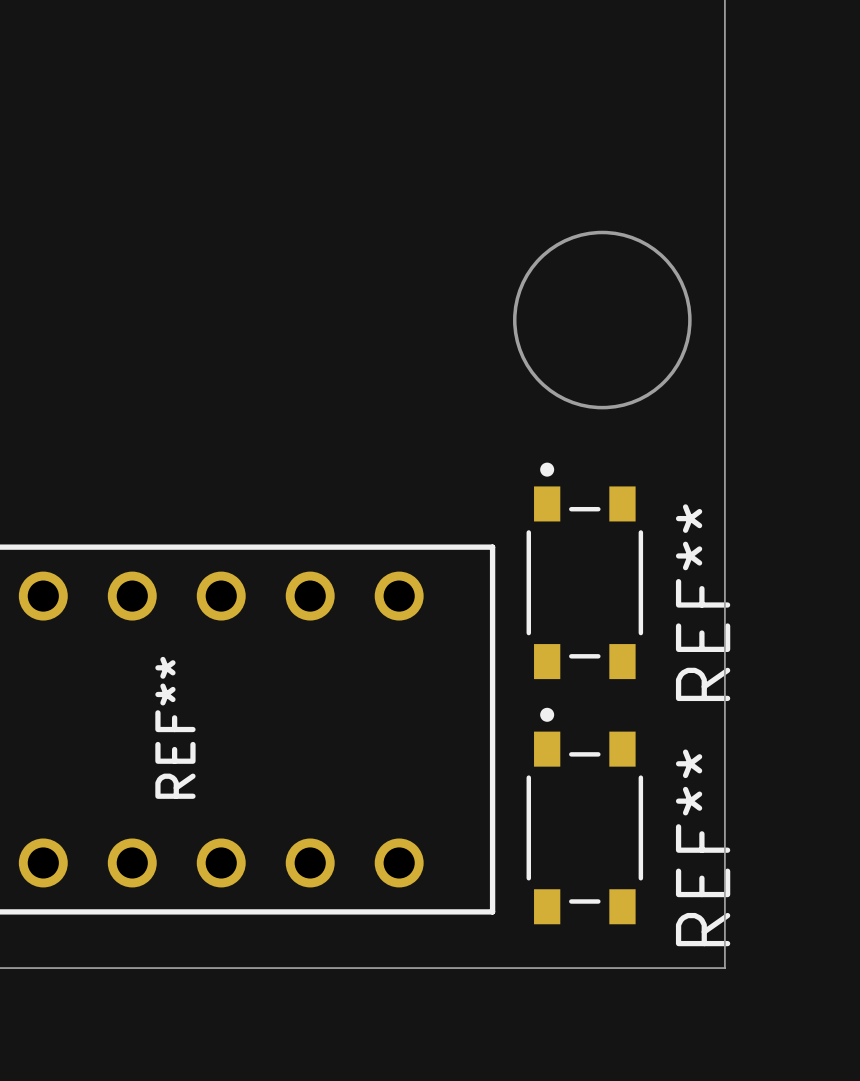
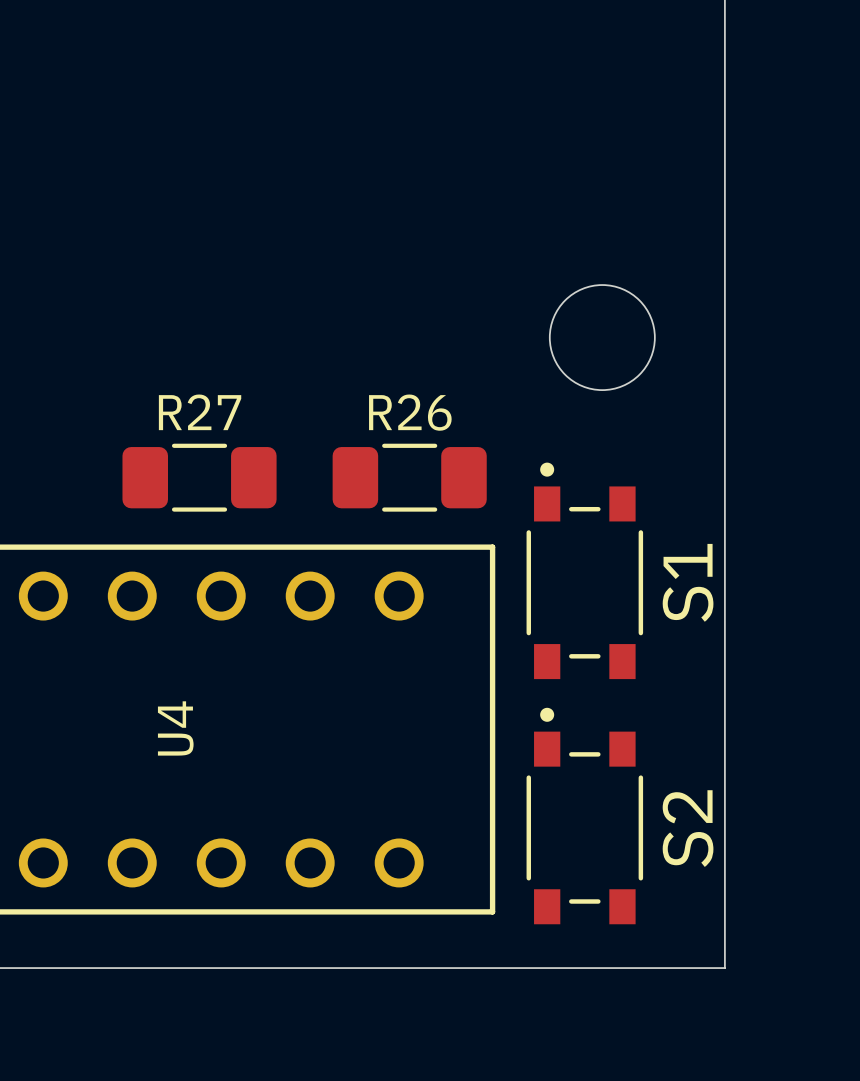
round board edge size: [513, 230, 692, 410] -> [548, 284, 656, 391]
R27: none -> (199, 477)
R26: none -> (409, 477)
REF** name: REF** (703, 602) -> S1 (688, 582)
REF** name: REF** (175, 727) -> U4 (175, 728)
REF** name: REF** (703, 847) -> S2 (688, 828)

